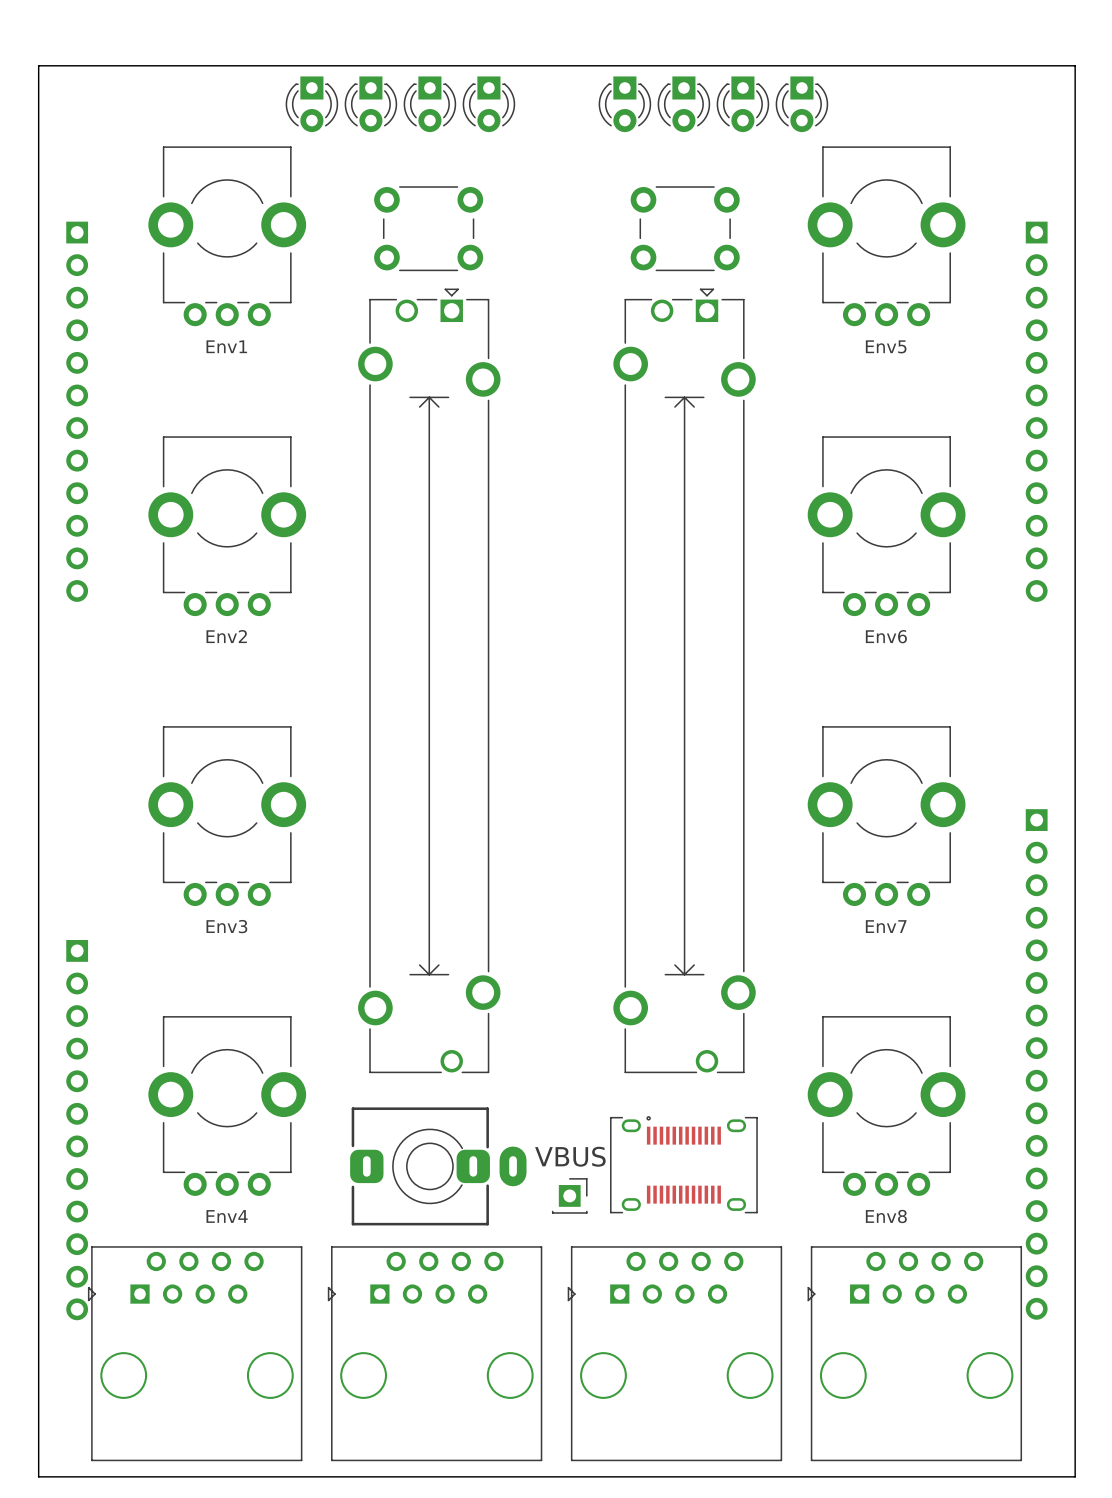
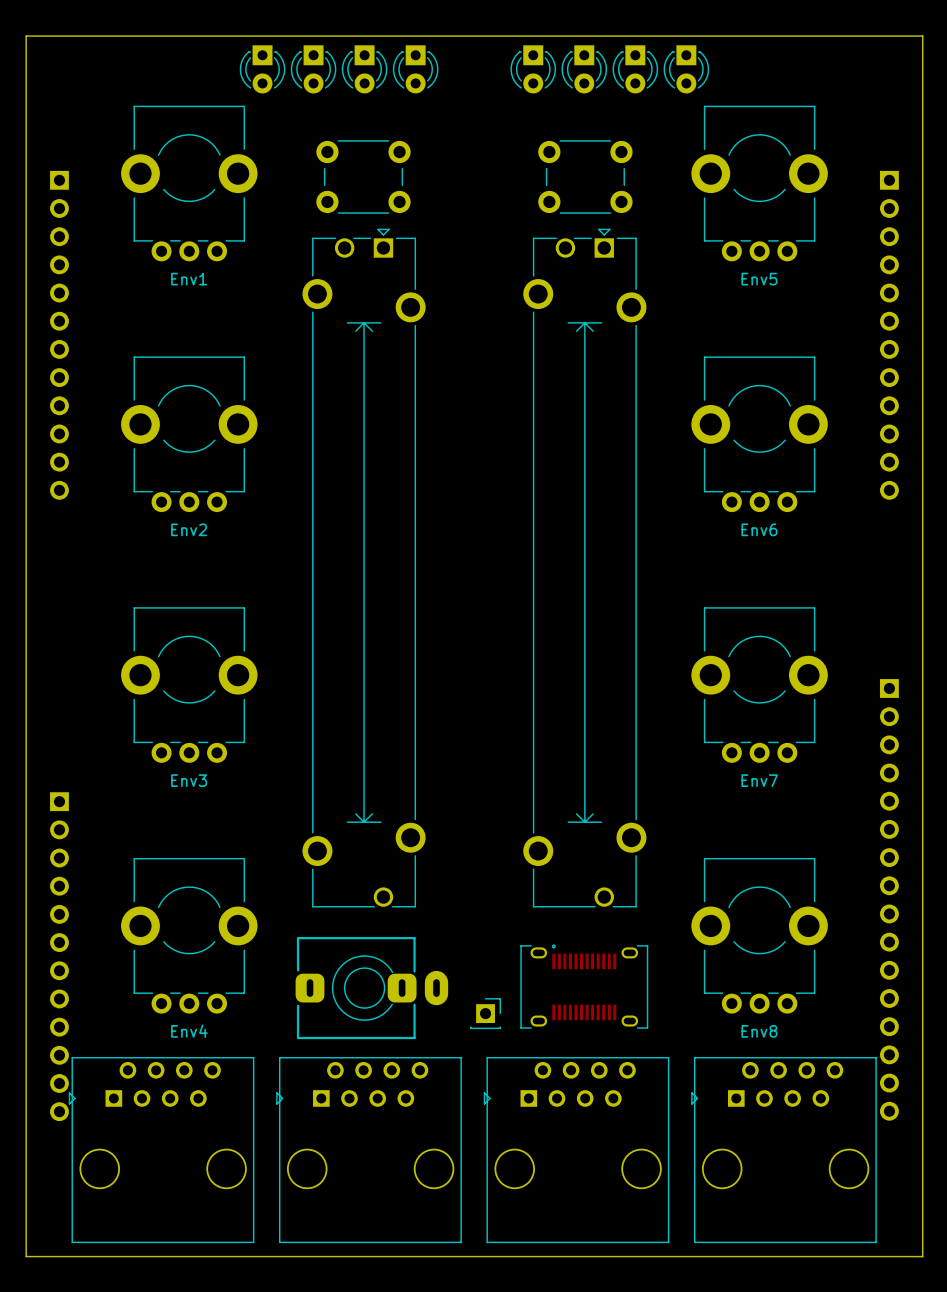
text: VBUS (570, 1156) -> none

